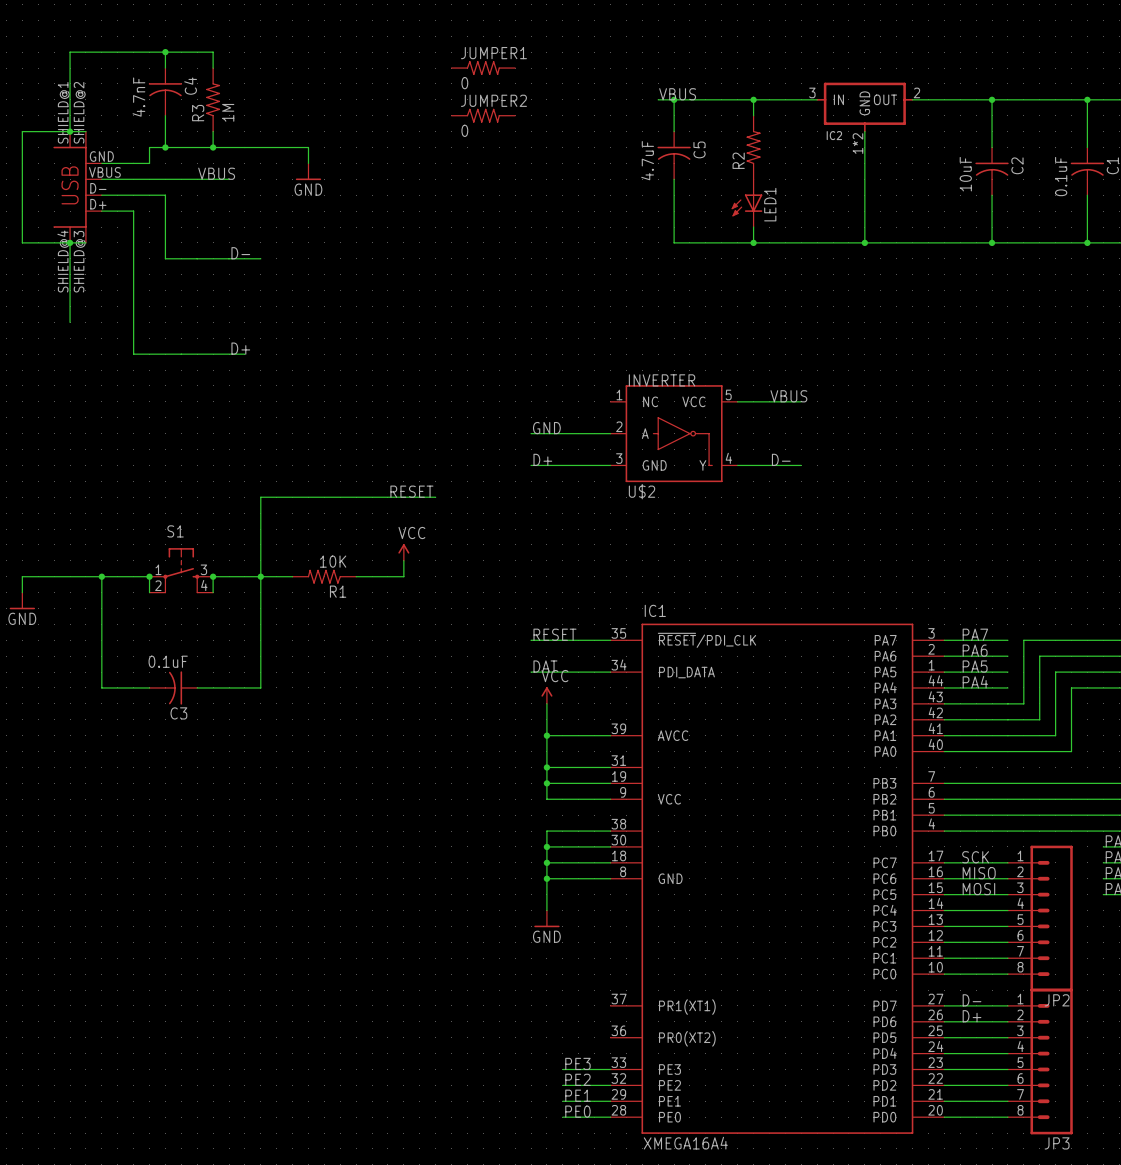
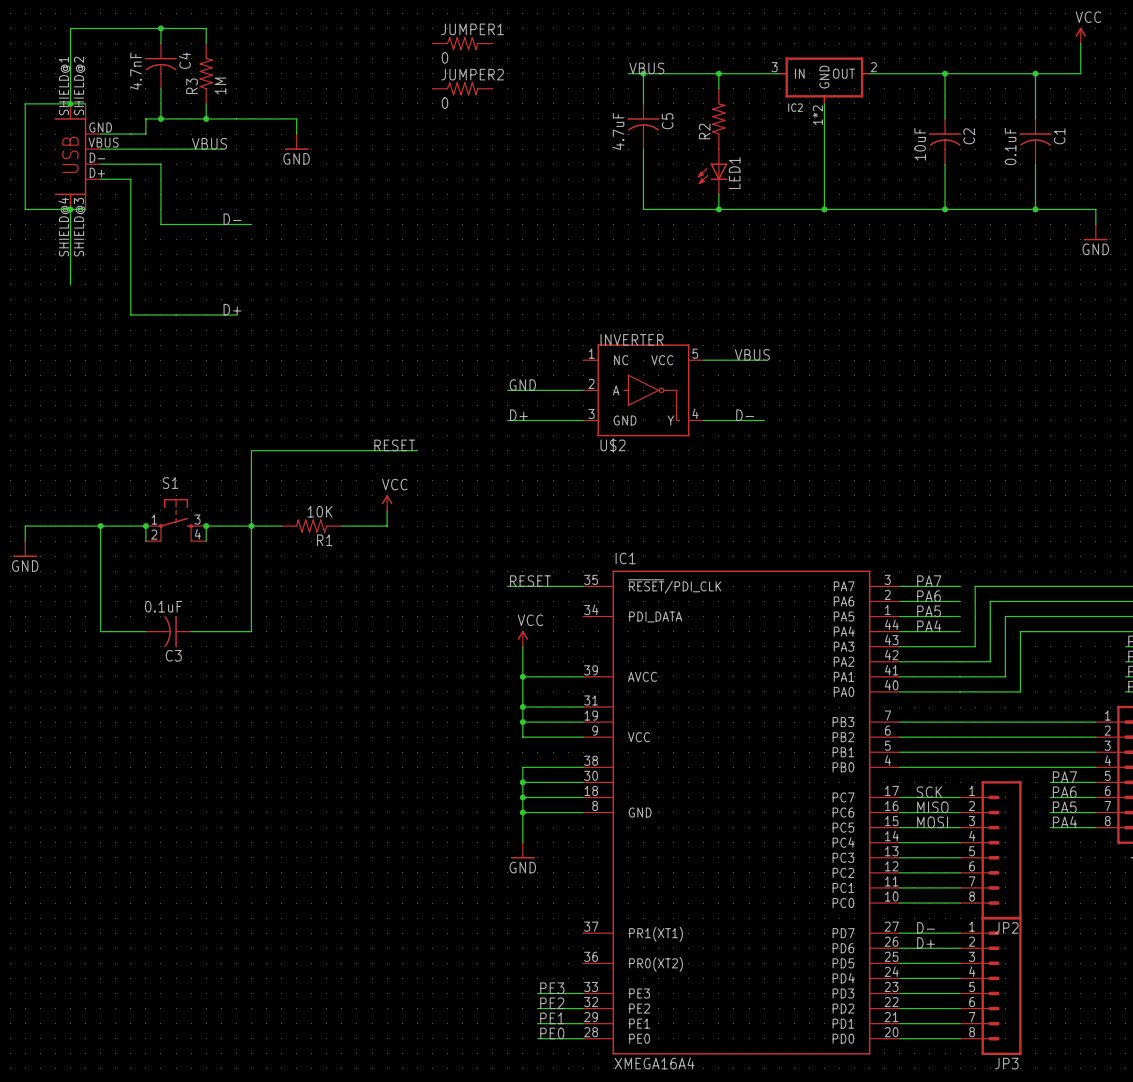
label: DAT (545, 666) -> none
wire: (531, 672) (610, 672) -> none

